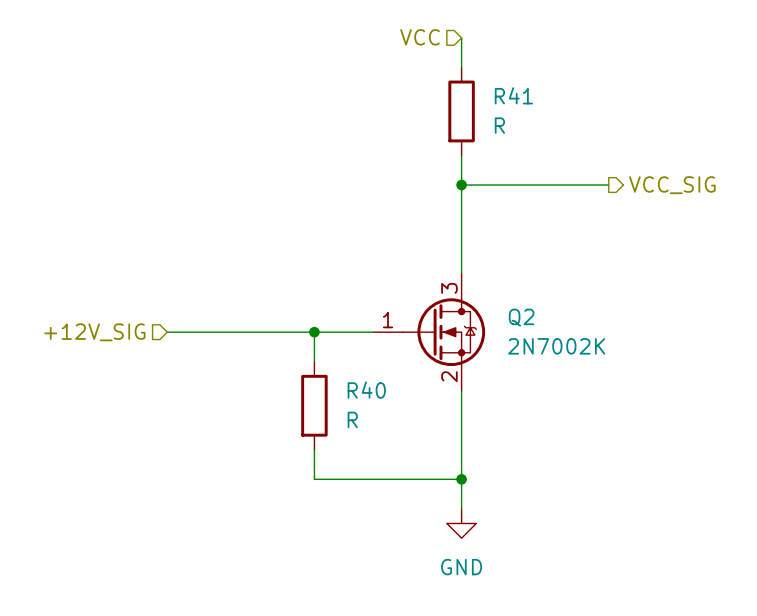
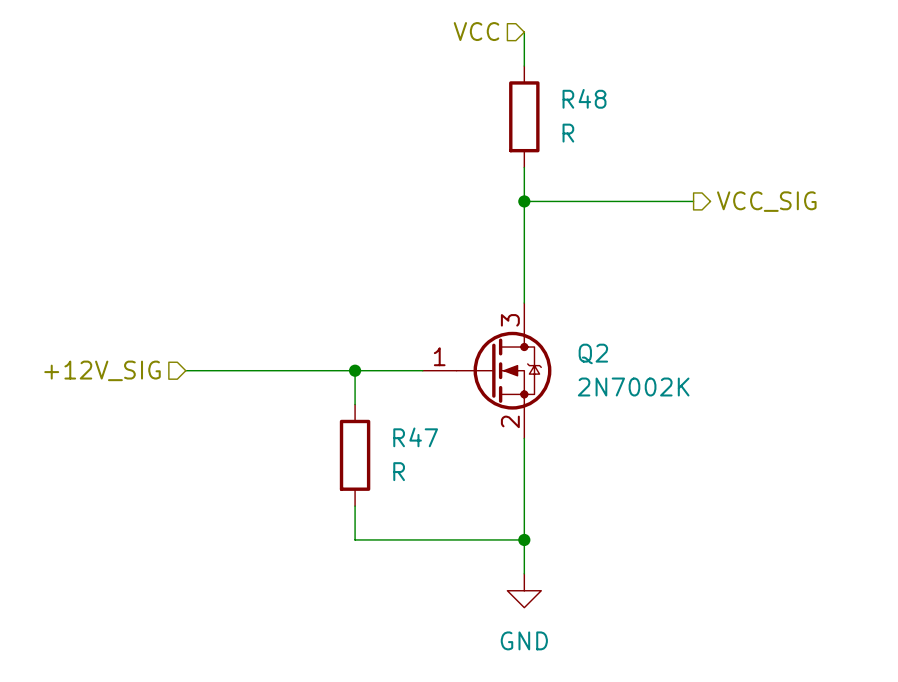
R41 name: R41 (513, 95) -> R48 (584, 98)
R40 name: R40 (366, 390) -> R47 (415, 437)

